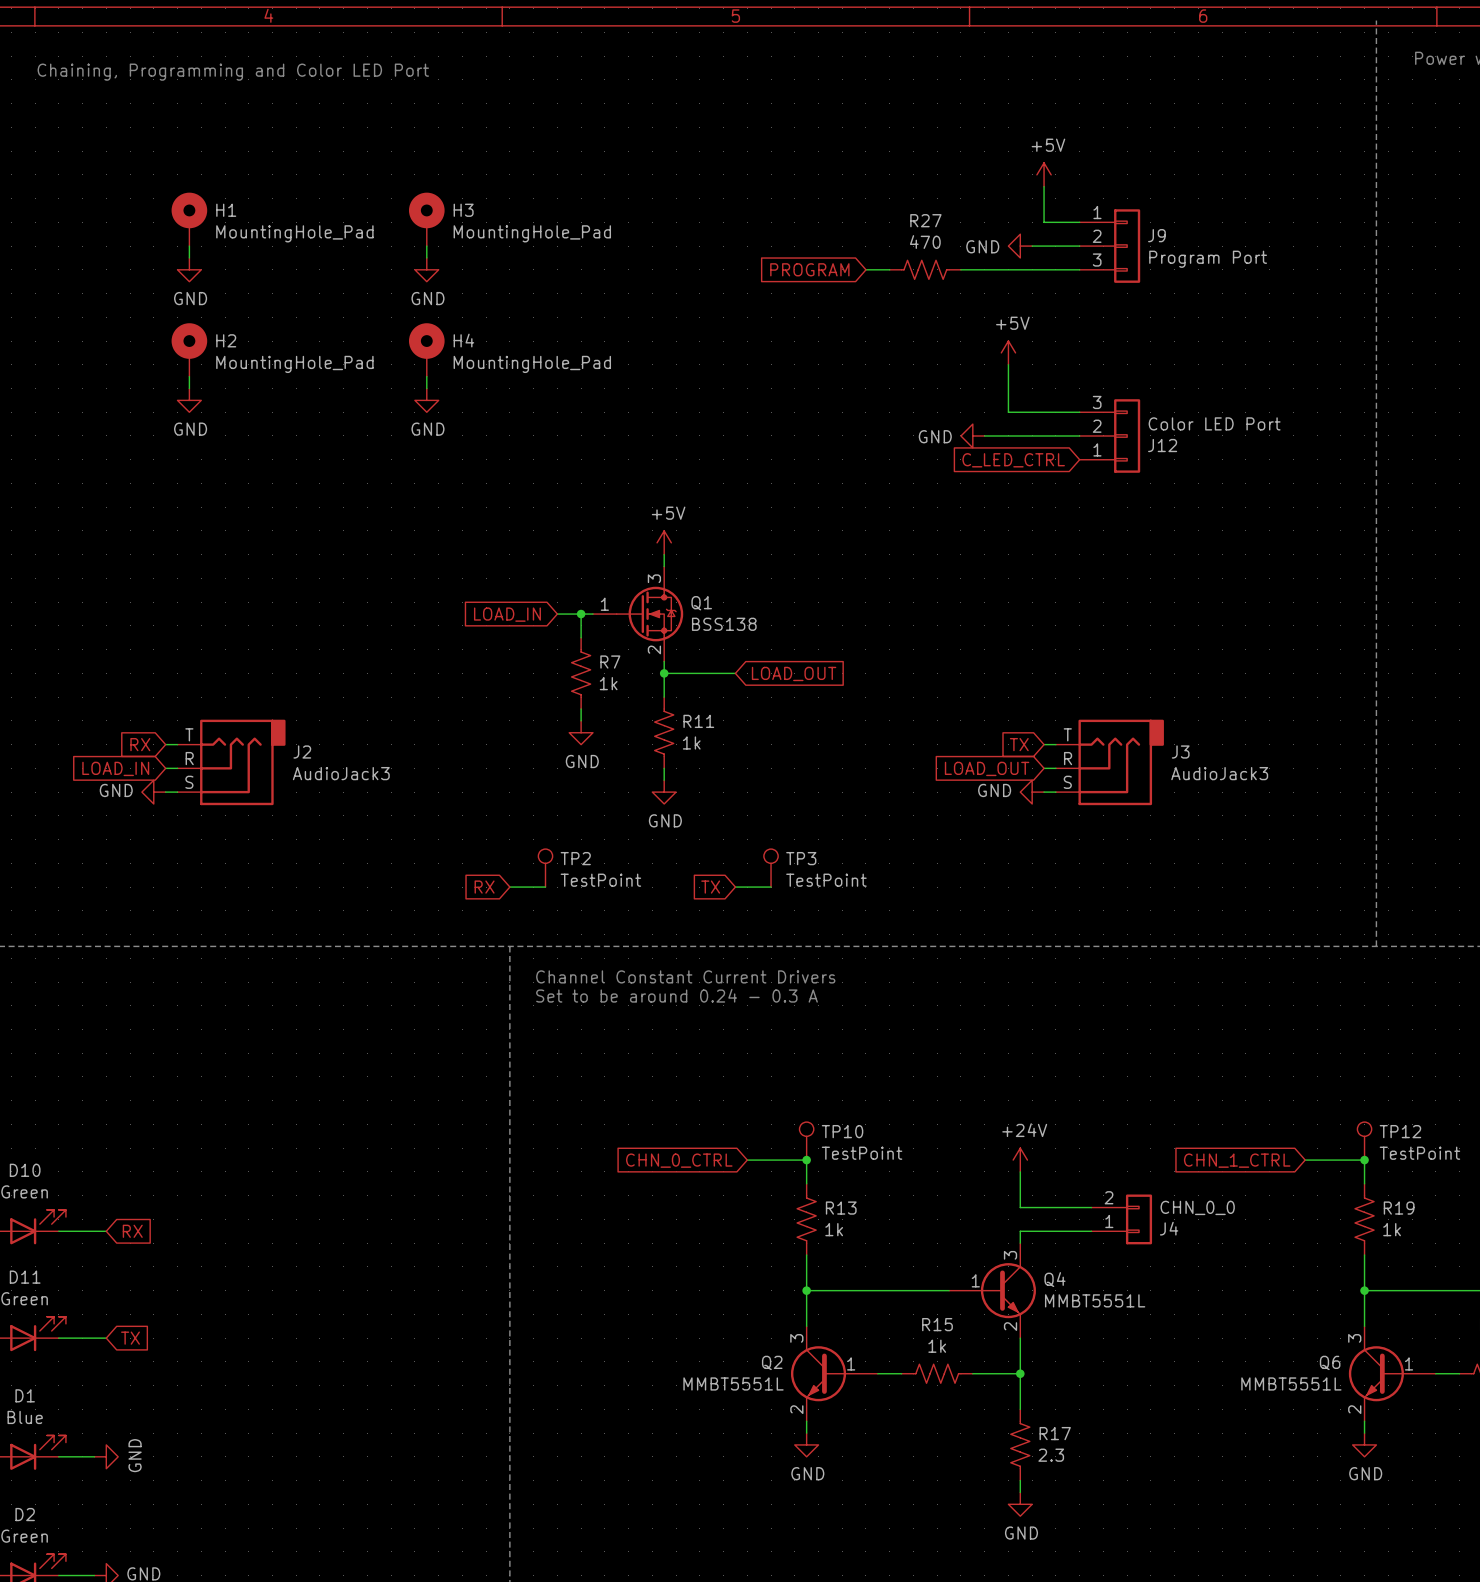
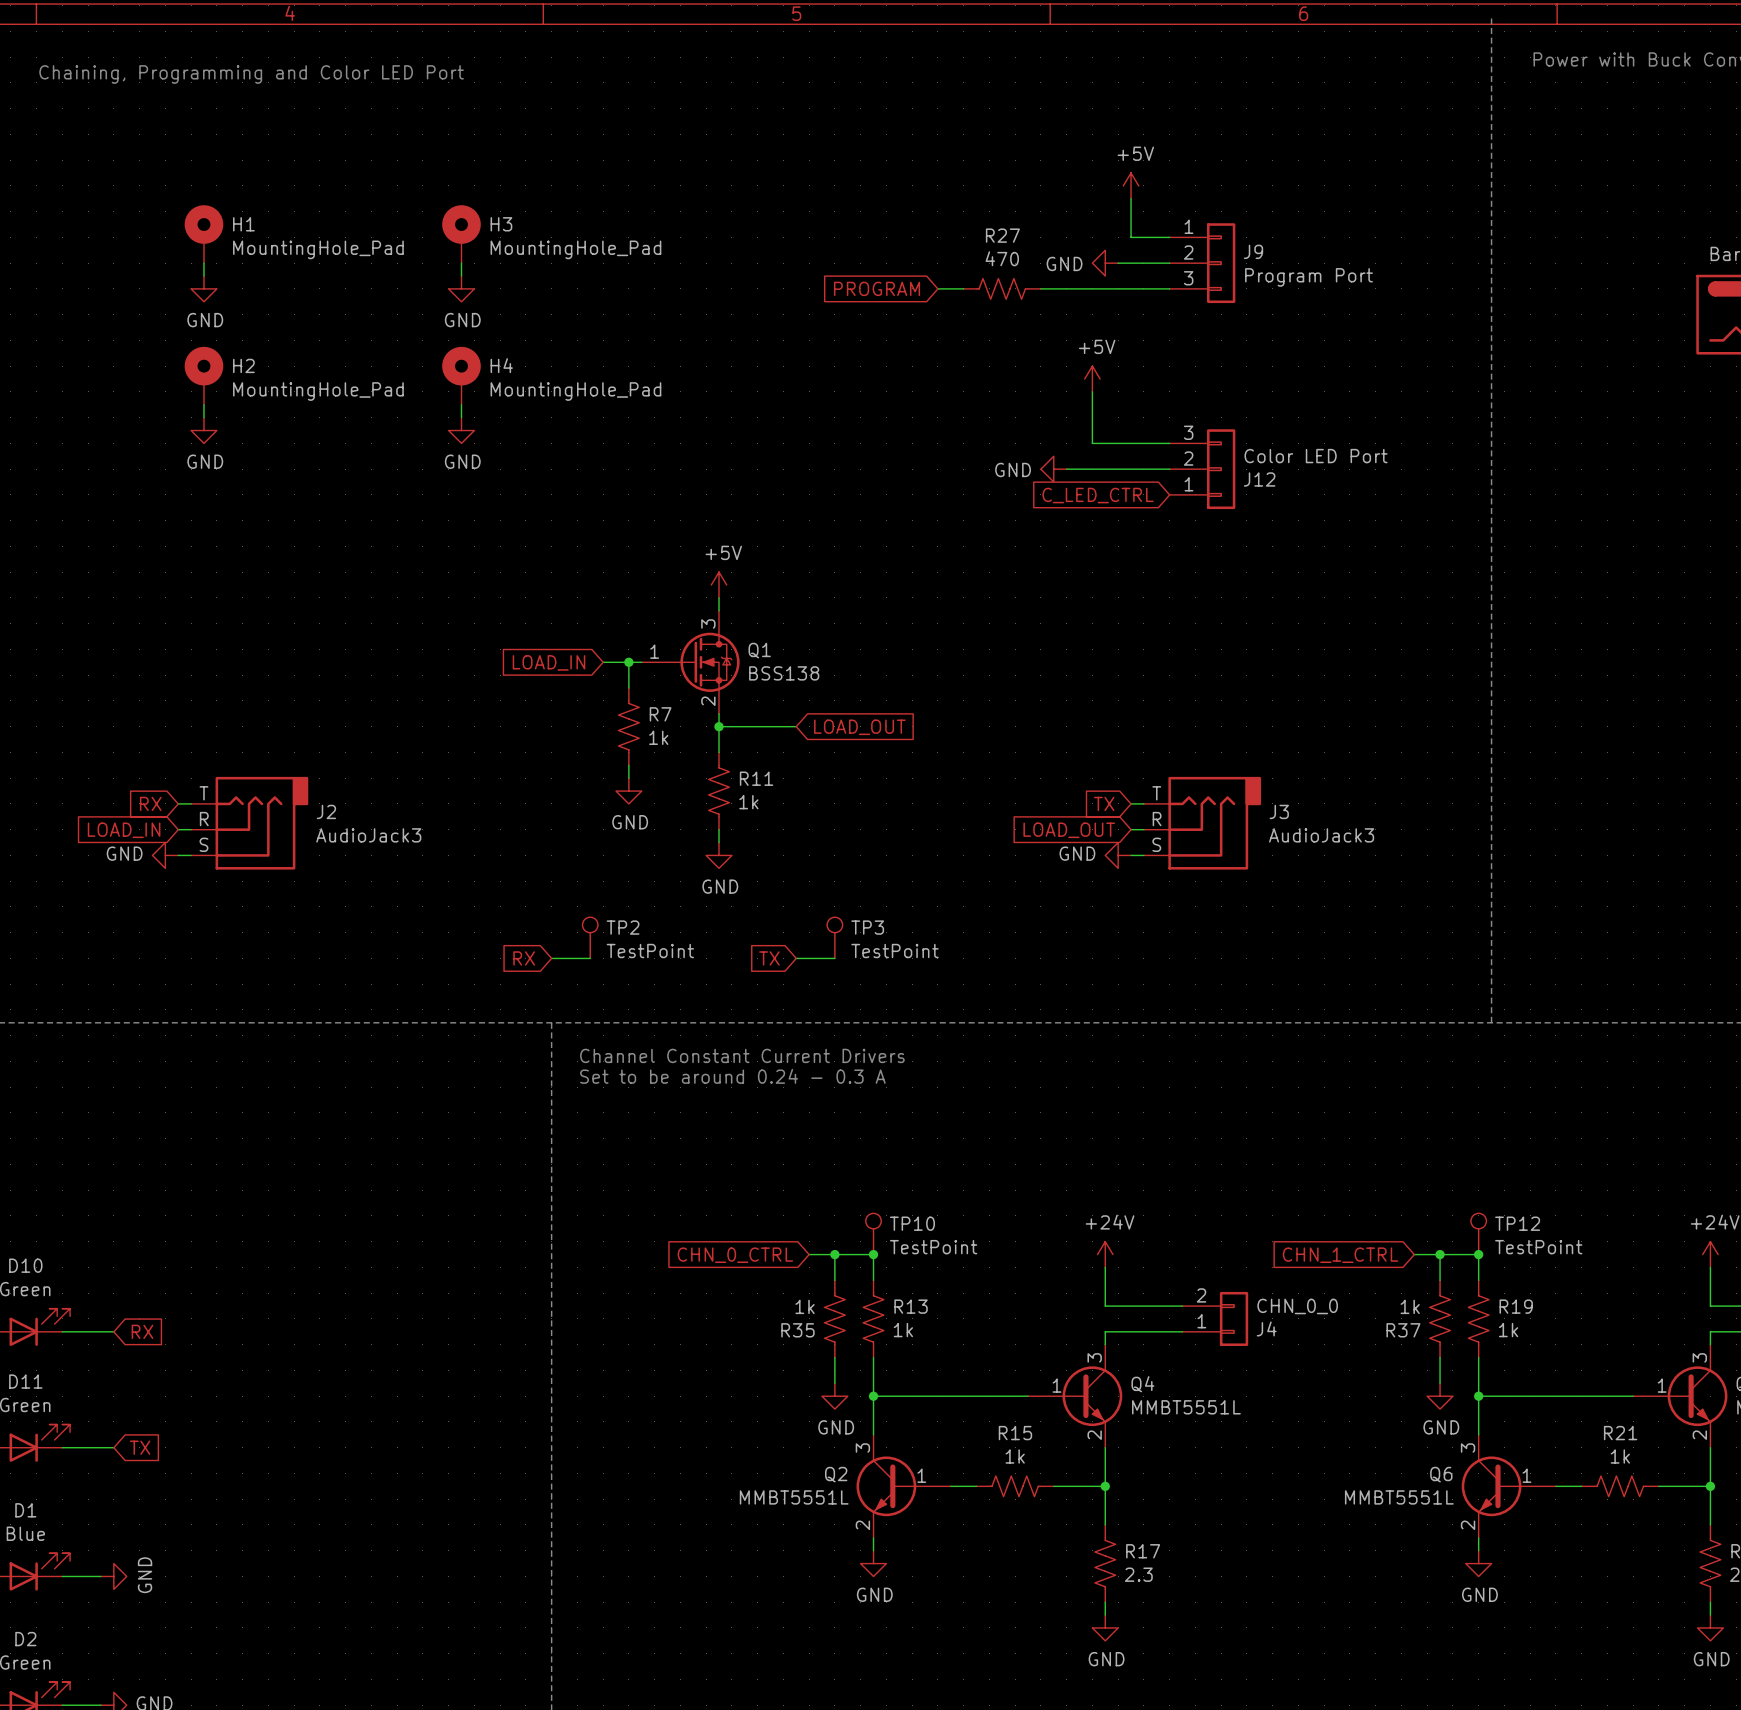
wire: none -> (834, 1254) (834, 1280)
junction: none -> (834, 1254)
wire: none -> (1440, 1254) (1440, 1280)
junction: none -> (1440, 1254)
R35: none -> 1k (834, 1318)
R37: none -> 1k (1440, 1318)
wire: none -> (834, 1357) (834, 1383)
wire: none -> (1440, 1357) (1440, 1383)
power symbol: none -> GND (834, 1396)
power symbol: none -> GND (1440, 1396)

